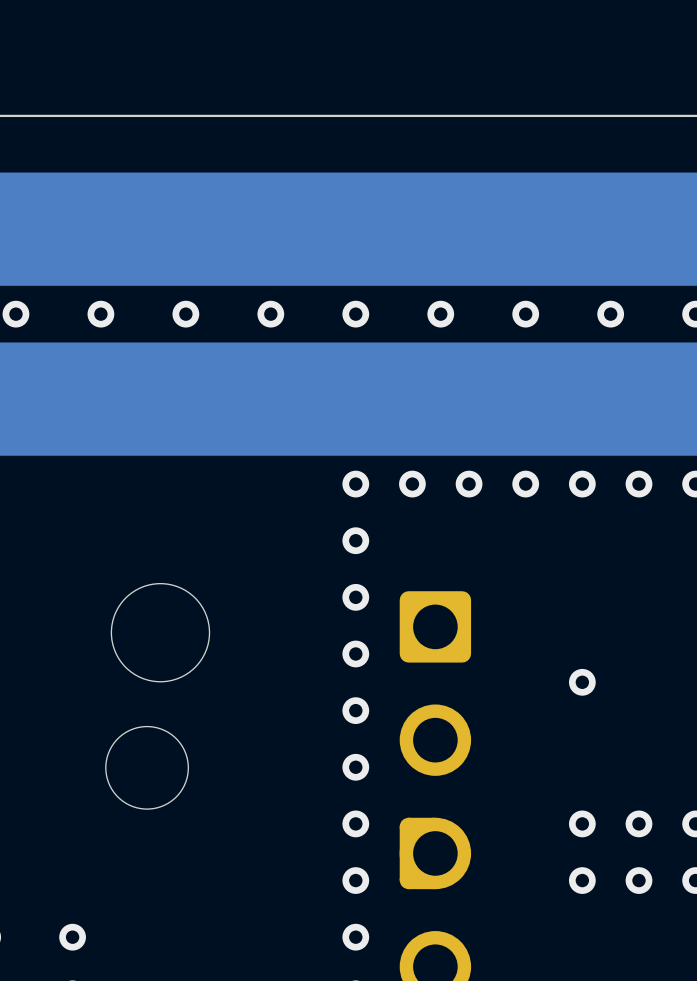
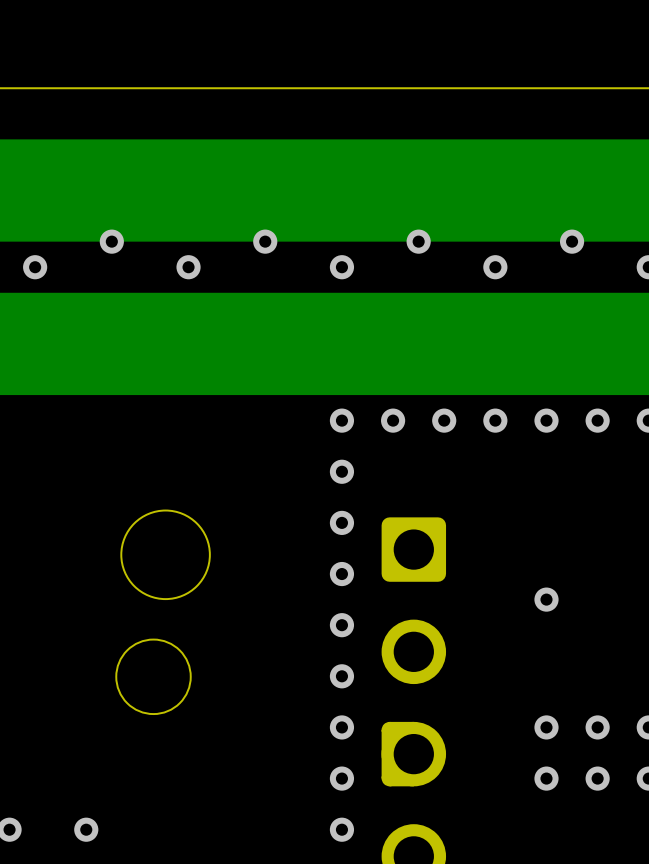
via position: (100, 314) -> (111, 241)
via position: (270, 314) -> (265, 241)
via position: (440, 314) -> (418, 241)
via position: (610, 314) -> (572, 241)

